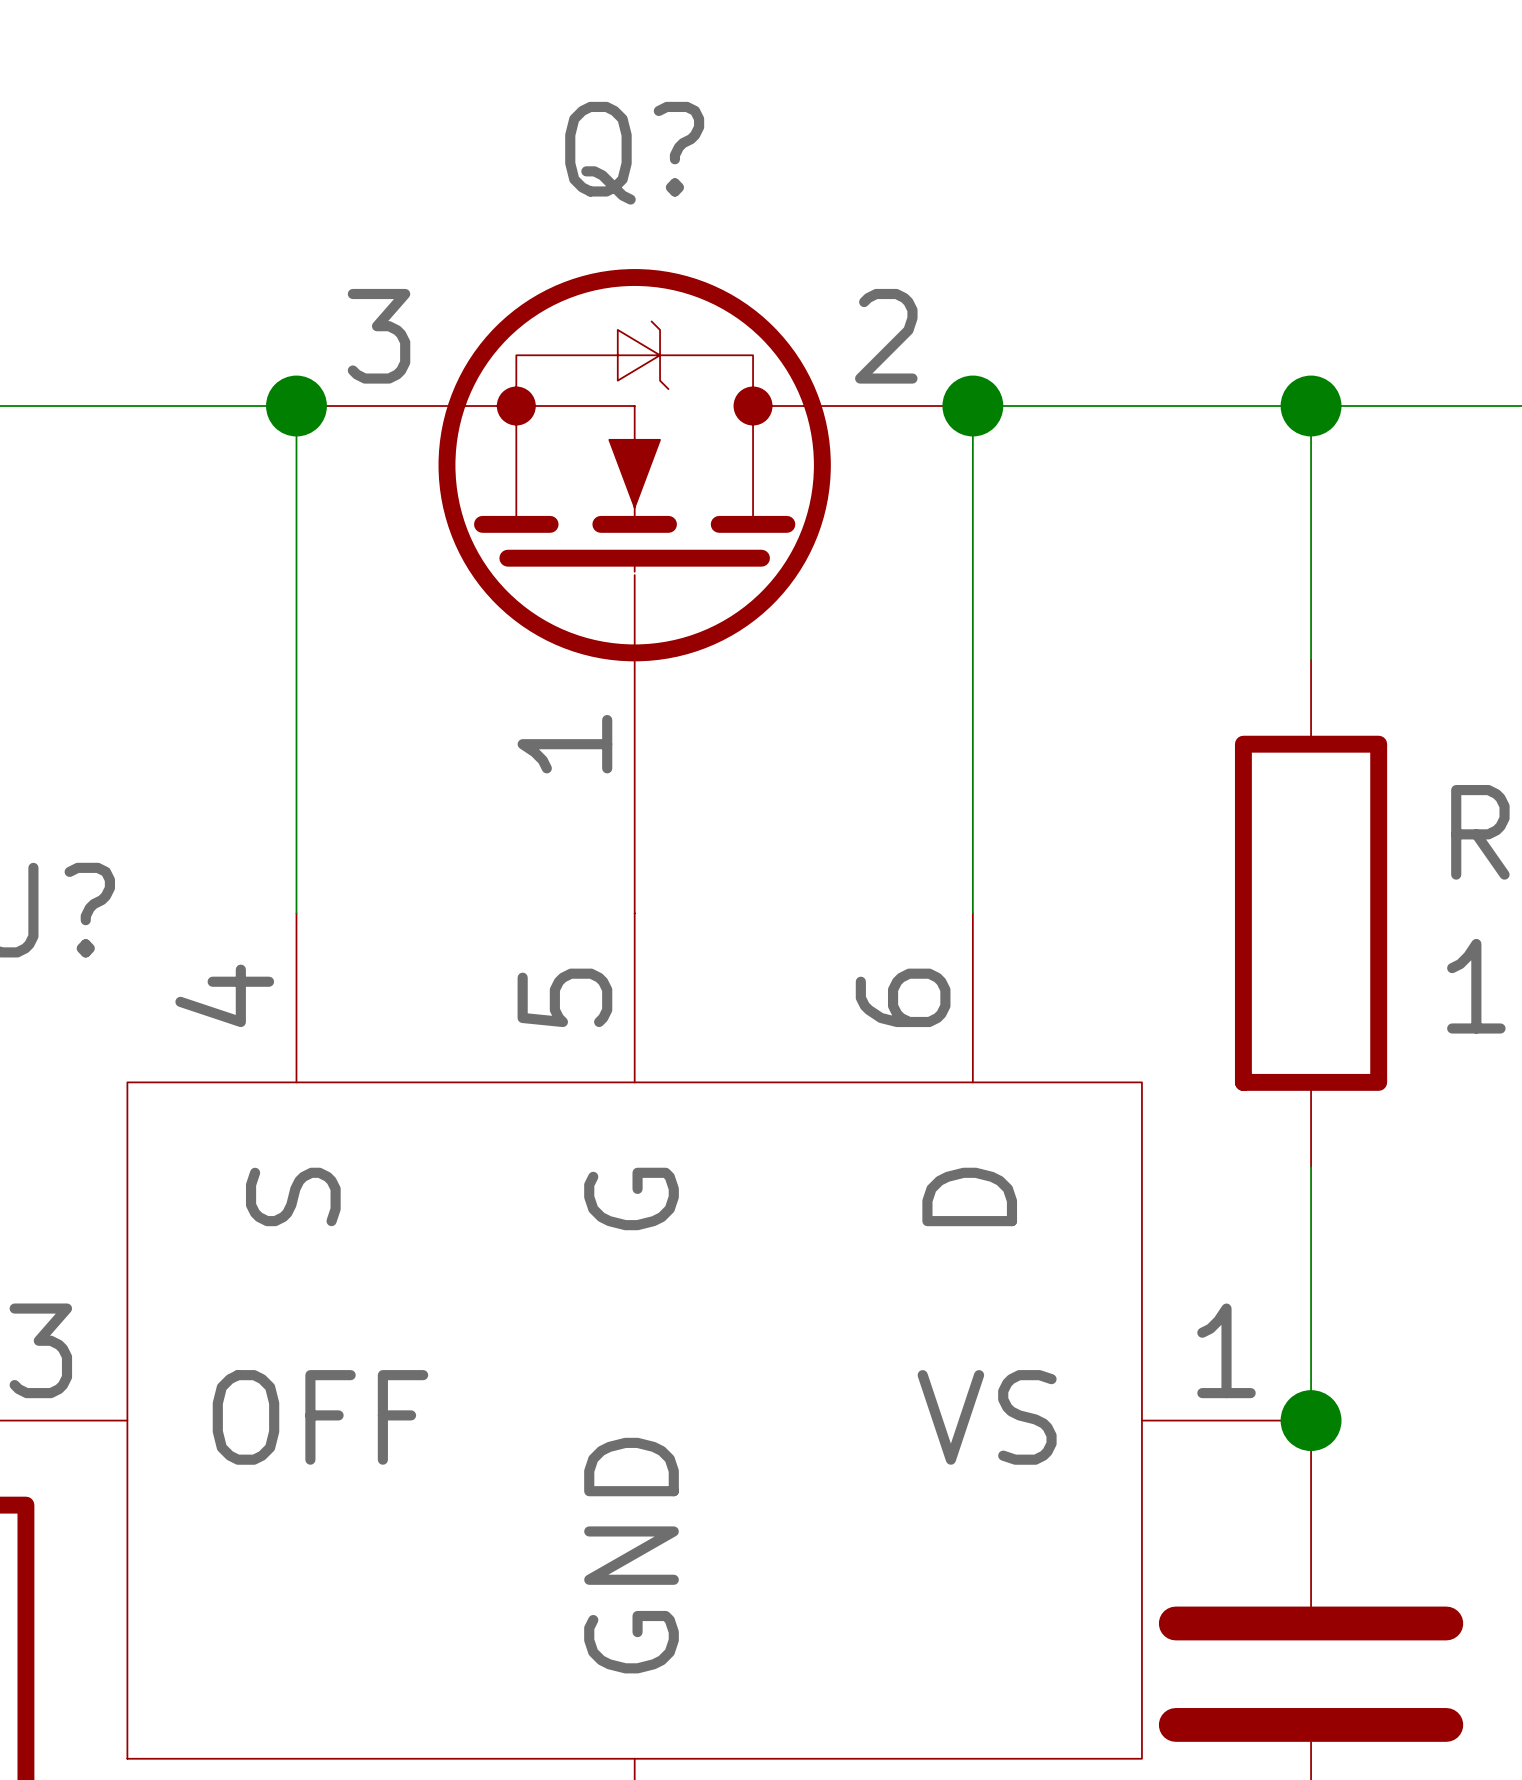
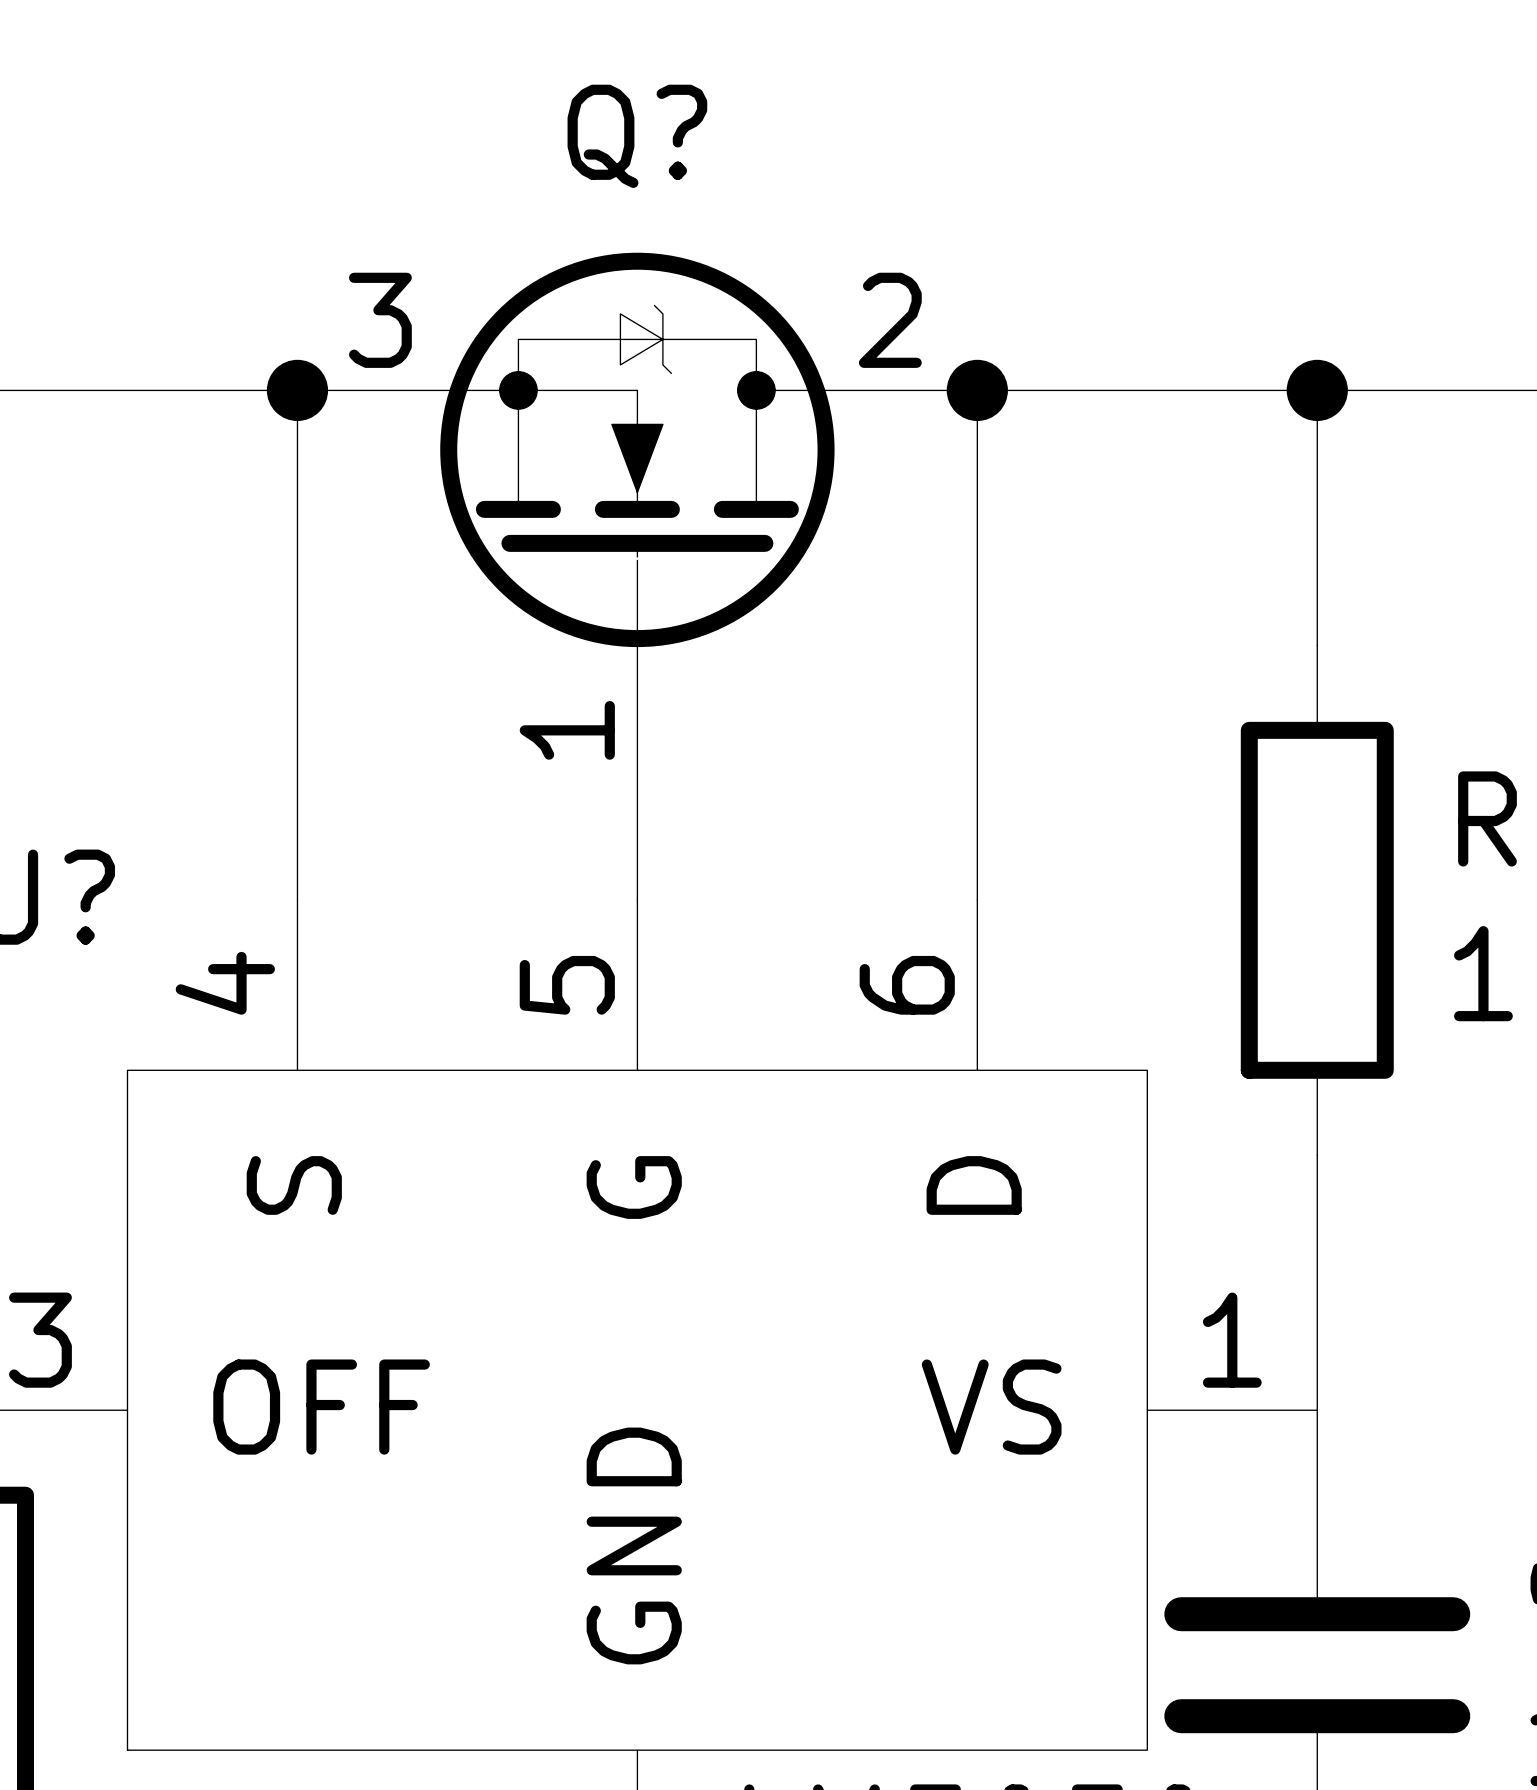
junction: (1311, 1420) -> none

